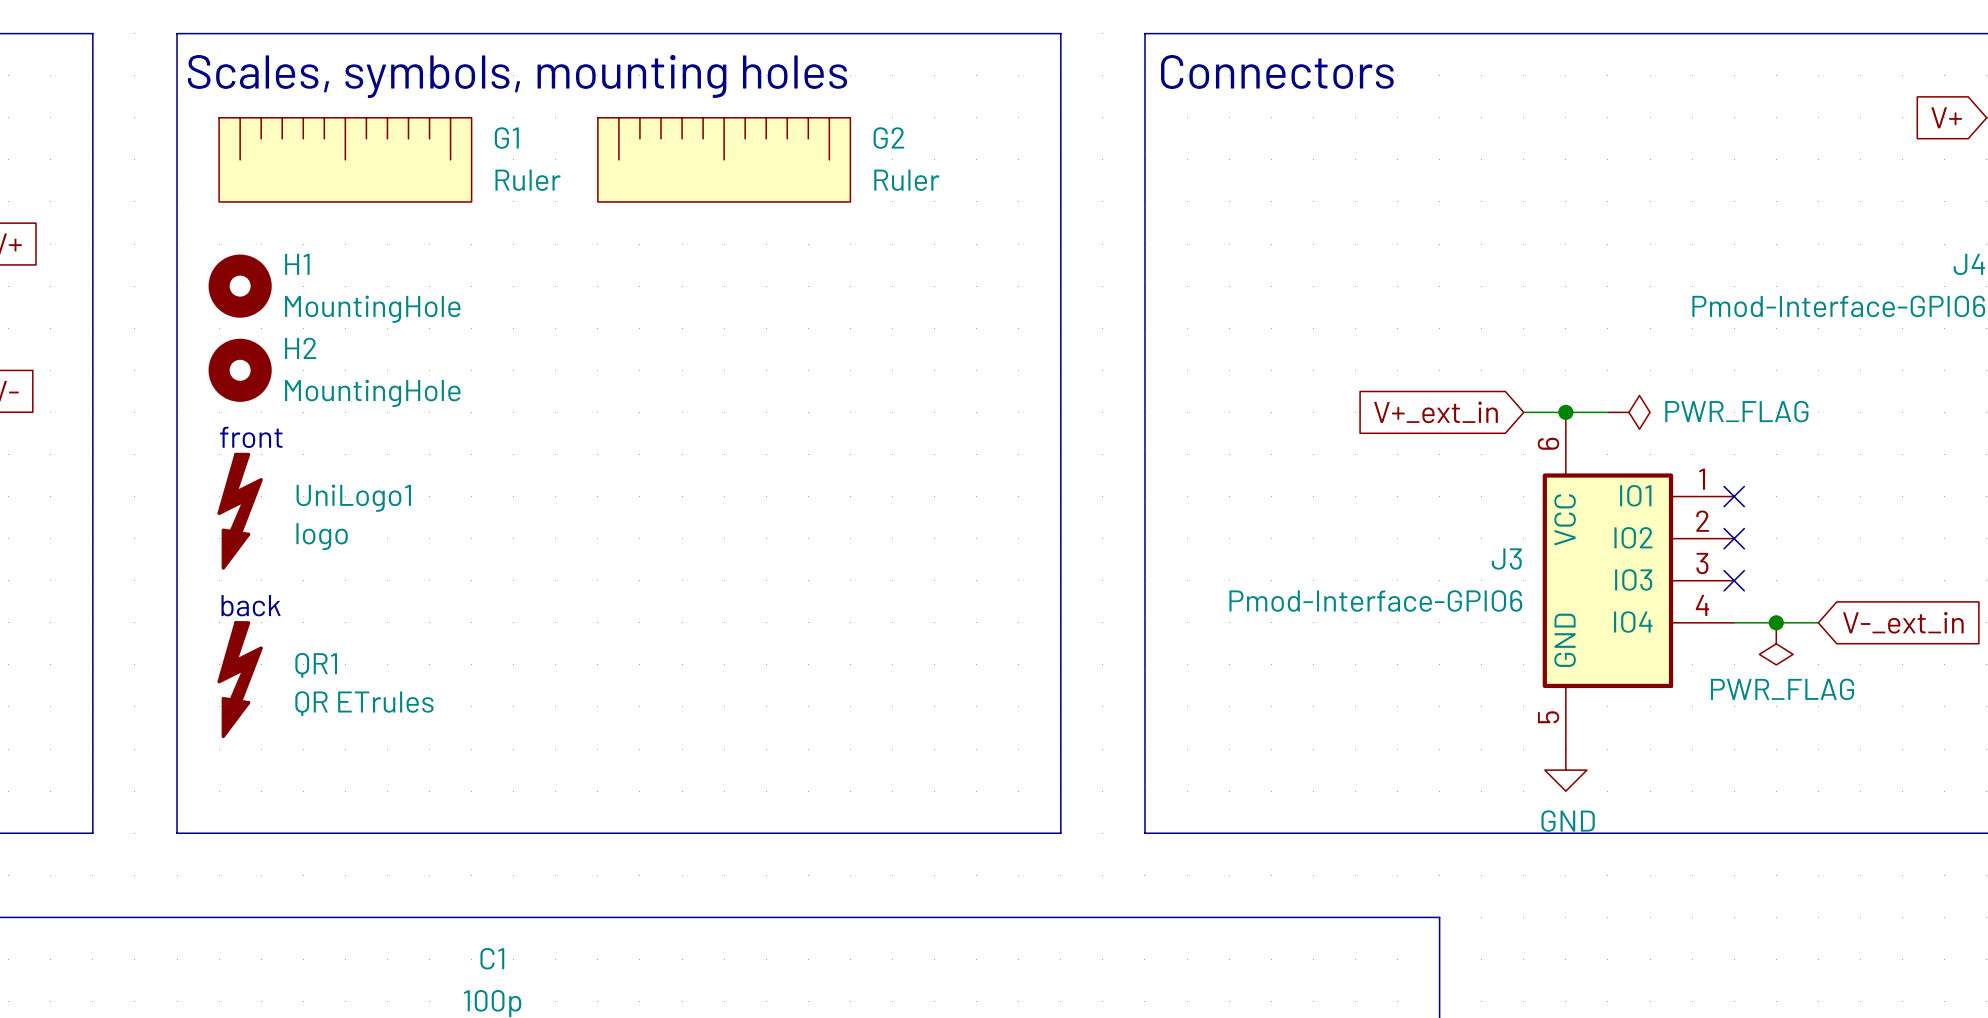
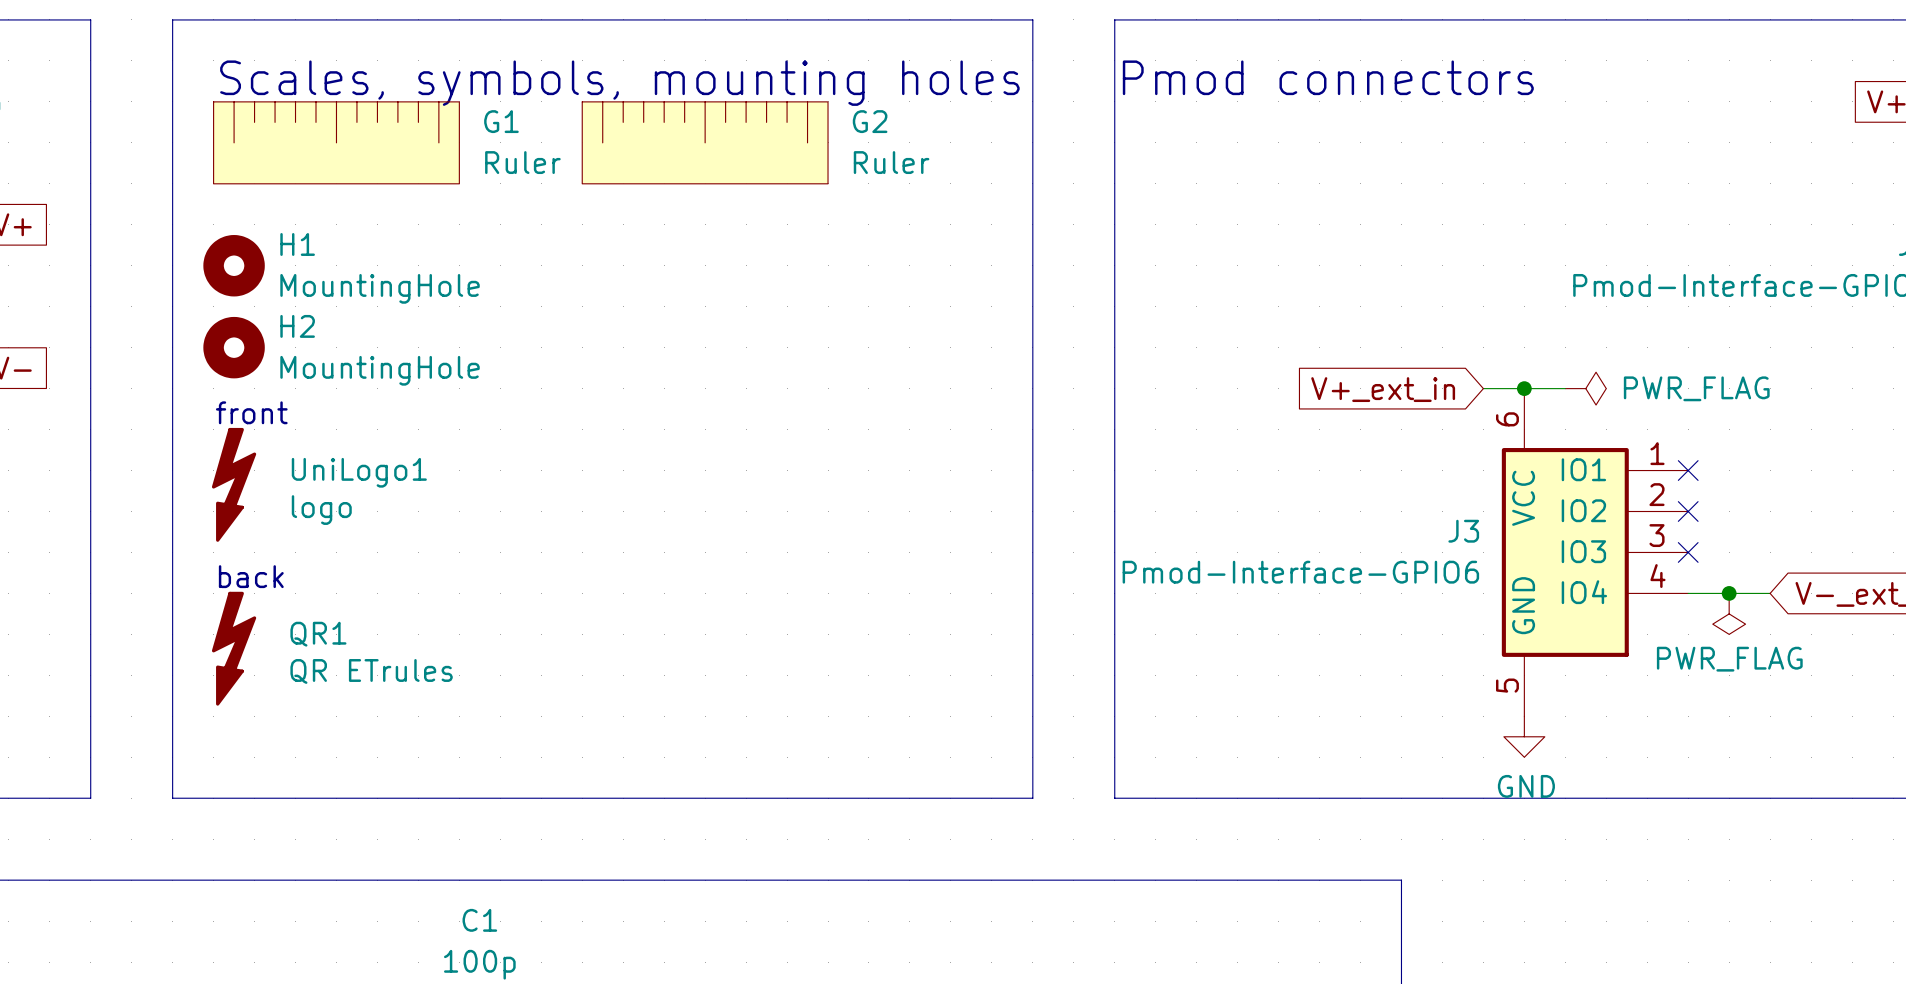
text: Connectors (1277, 72) -> Pmod connectors (1328, 77)
text position: Scales, symbols, mounting holes (517, 76) -> Scales, symbols, mounting holes (619, 83)

